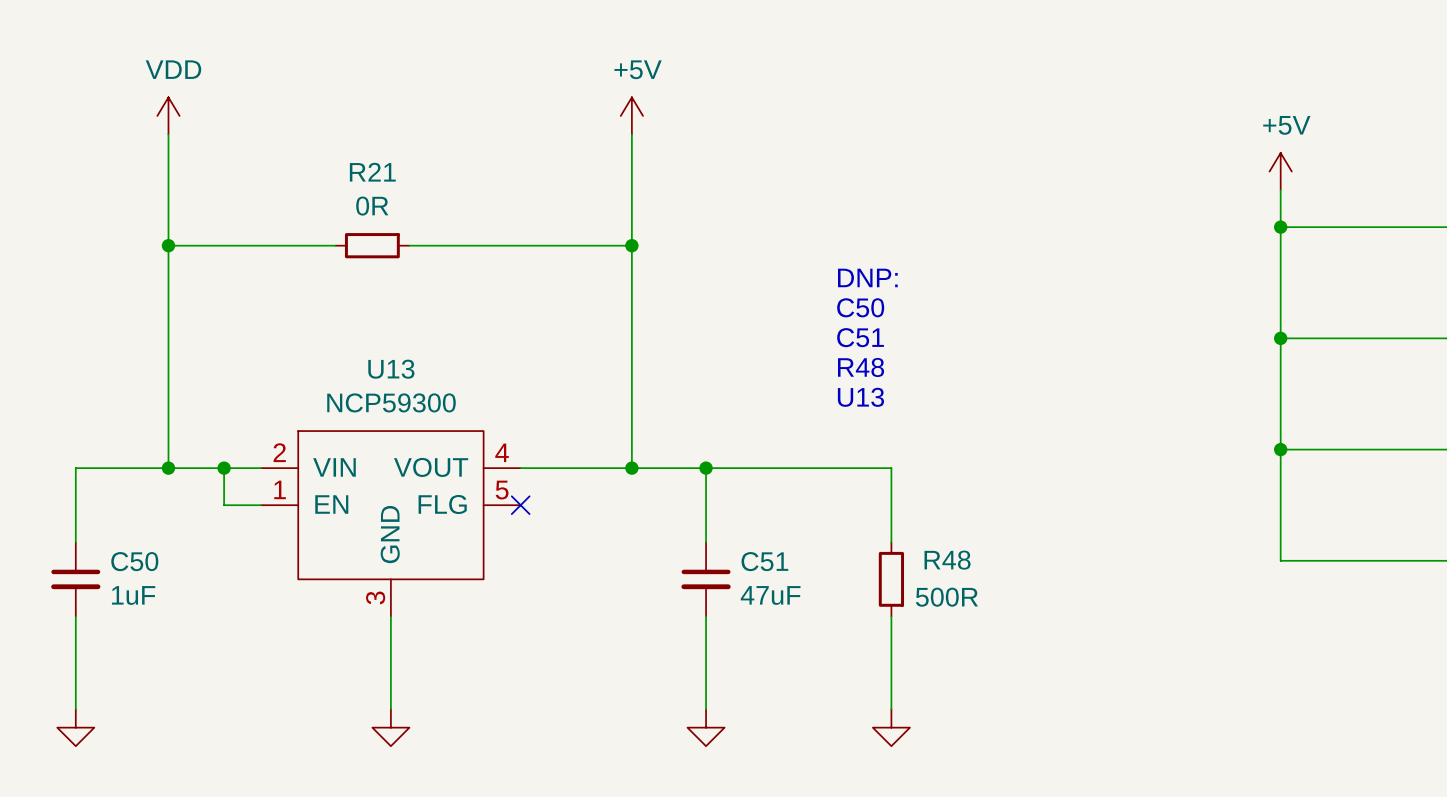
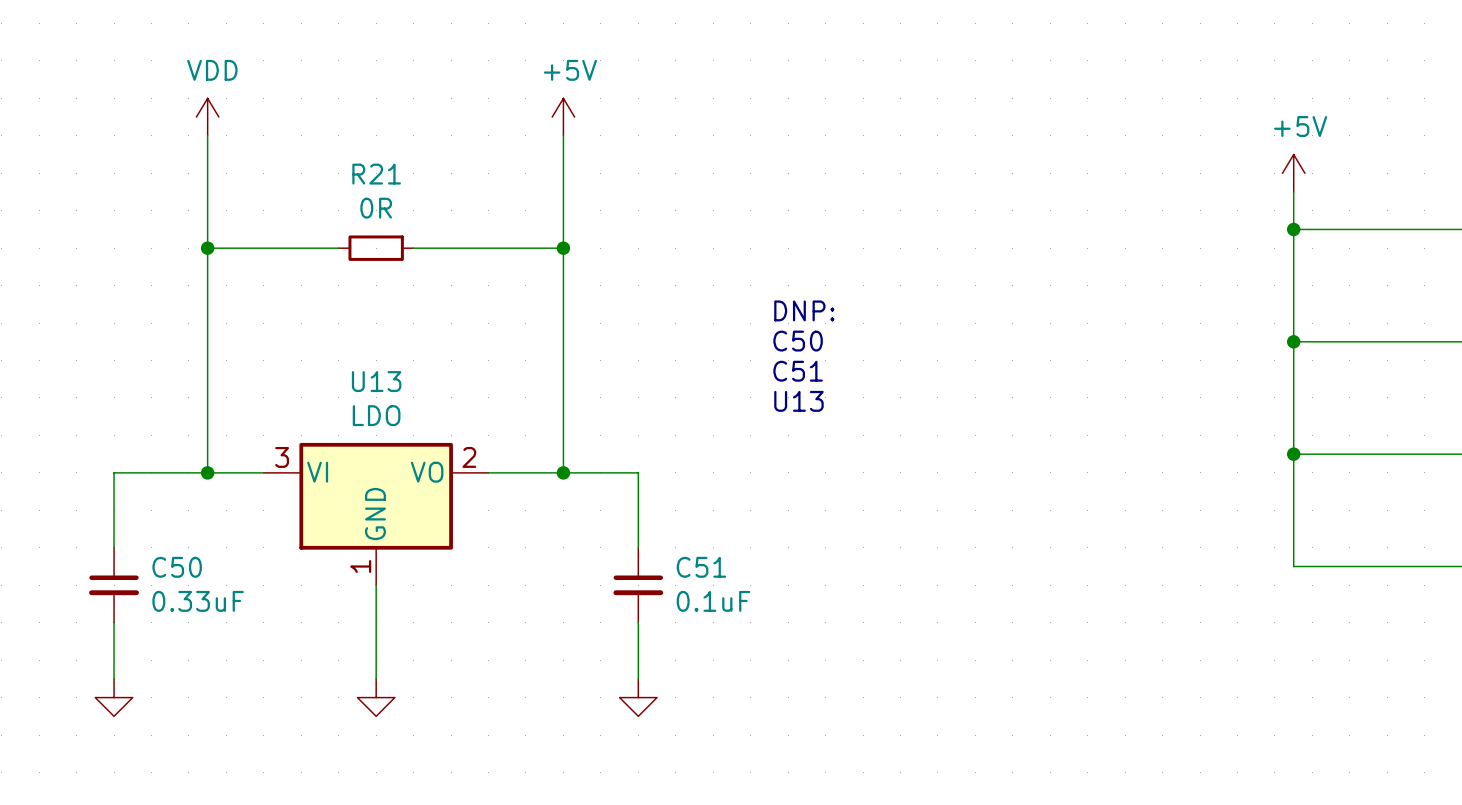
power symbol position: VDD (168, 115) -> VDD (207, 117)
power symbol position: +5V (631, 115) -> +5V (563, 117)
wire: (168, 134) (168, 468) -> (207, 135) (207, 472)
wire: none -> (563, 135) (563, 472)
wire: (631, 134) (631, 468) (891, 468) (891, 542) -> none
wire: (168, 245) (205, 245) -> none
junction position: (168, 245) -> (207, 248)
wire: (557, 245) (631, 245) -> none
junction position: (631, 245) -> (563, 248)
text position: DNP: (867, 277) -> DNP: (804, 310)
text position: C50 (860, 307) -> C50 (798, 341)
text position: C51 (860, 337) -> C51 (798, 371)
text: R48 (861, 367) -> none
text position: U13 (860, 397) -> U13 (798, 401)
U13 value: NCP59300 (391, 402) -> LDO (376, 415)
U13 symbol: [261, 431, 521, 617] -> [263, 442, 489, 586]
wire: (112, 468) (75, 468) (75, 542) -> (114, 472) (114, 547)
junction: (168, 468) -> none
junction: none -> (207, 472)
wire: (224, 468) (224, 505) (261, 505) -> none
junction: (224, 468) -> none
junction: none -> (563, 472)
junction: (631, 468) -> none
wire: (706, 468) (706, 542) -> (638, 472) (638, 547)
junction: (706, 468) -> none
no-connect mark: (520, 505) -> none
C50 position: (75, 579) -> (114, 585)
C51 position: (706, 579) -> (638, 585)
R48: 500R (891, 579) -> none
C50 value: 1uF (133, 595) -> 0.33uF (198, 601)
C51 value: 47uF (770, 595) -> 0.1uF (713, 601)
wire: (75, 616) (75, 709) -> none
wire: none -> (114, 622) (114, 678)
wire: (390, 616) (390, 709) -> (376, 585) (376, 678)
wire: none -> (638, 622) (638, 678)
wire: (706, 616) (706, 709) -> none
wire: (891, 616) (891, 709) -> none
power symbol position: (75, 727) -> (114, 697)
power symbol position: (390, 727) -> (376, 697)
power symbol position: (706, 727) -> (638, 697)
power symbol: (891, 727) -> none

